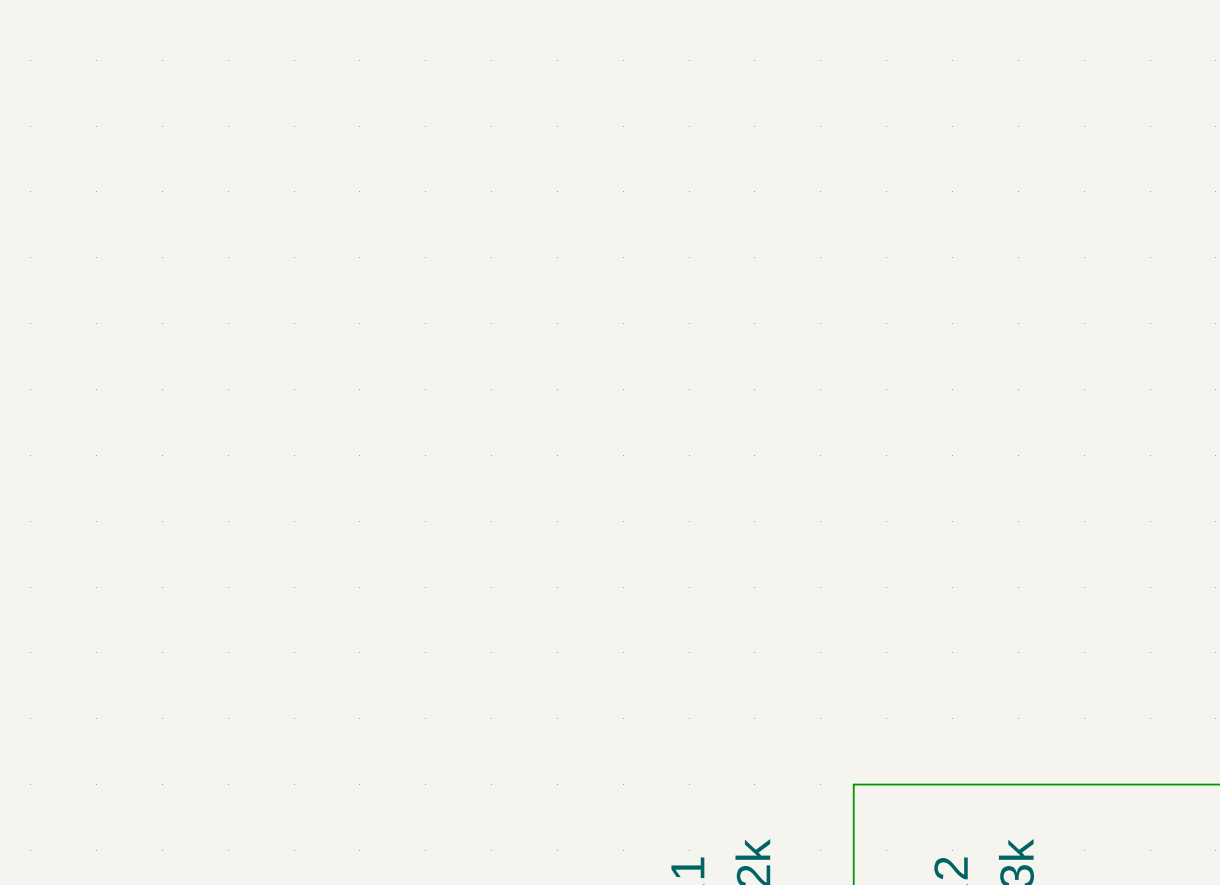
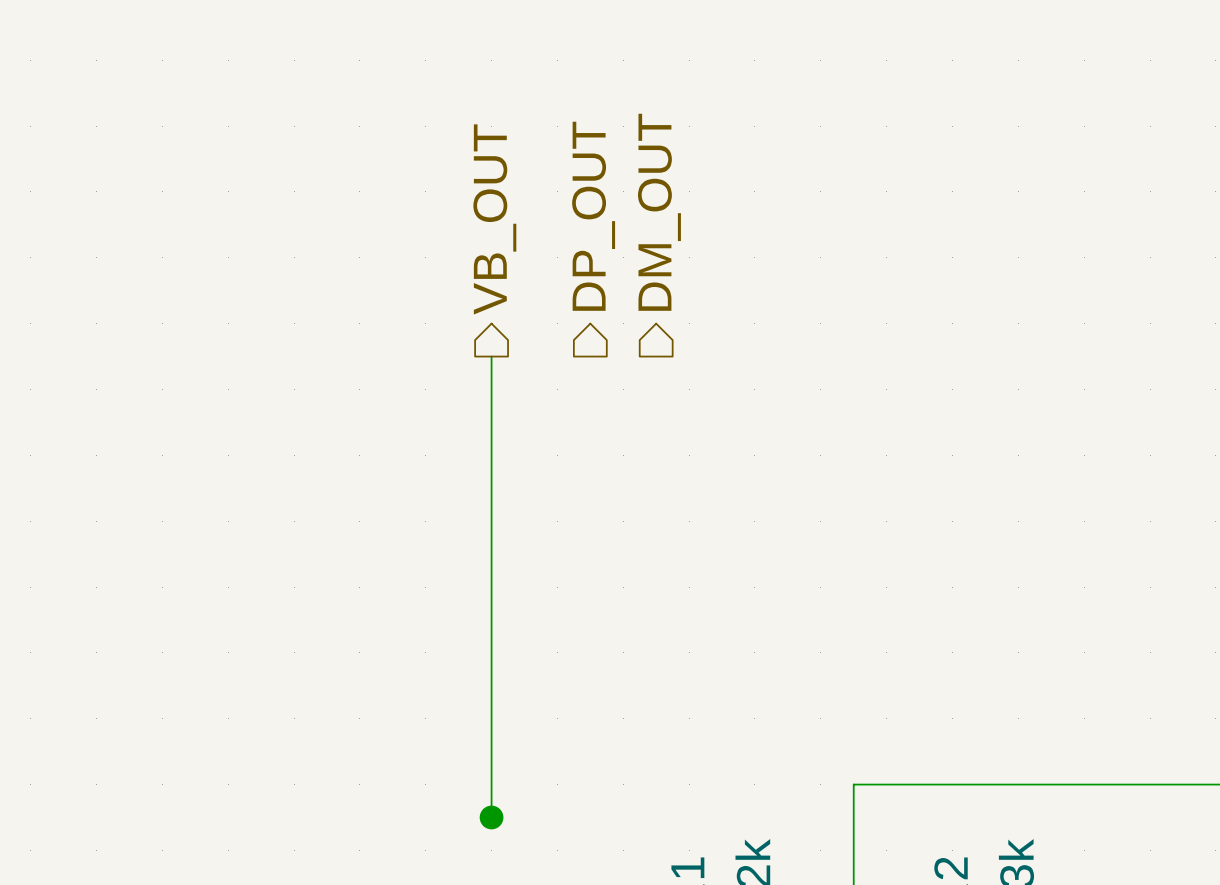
hierarchical label: none -> DM_OUT (659, 212)
hierarchical label: none -> DP_OUT (593, 216)
hierarchical label: none -> VB_OUT (494, 219)
wire: none -> (491, 356) (491, 817)
junction: none -> (491, 817)

